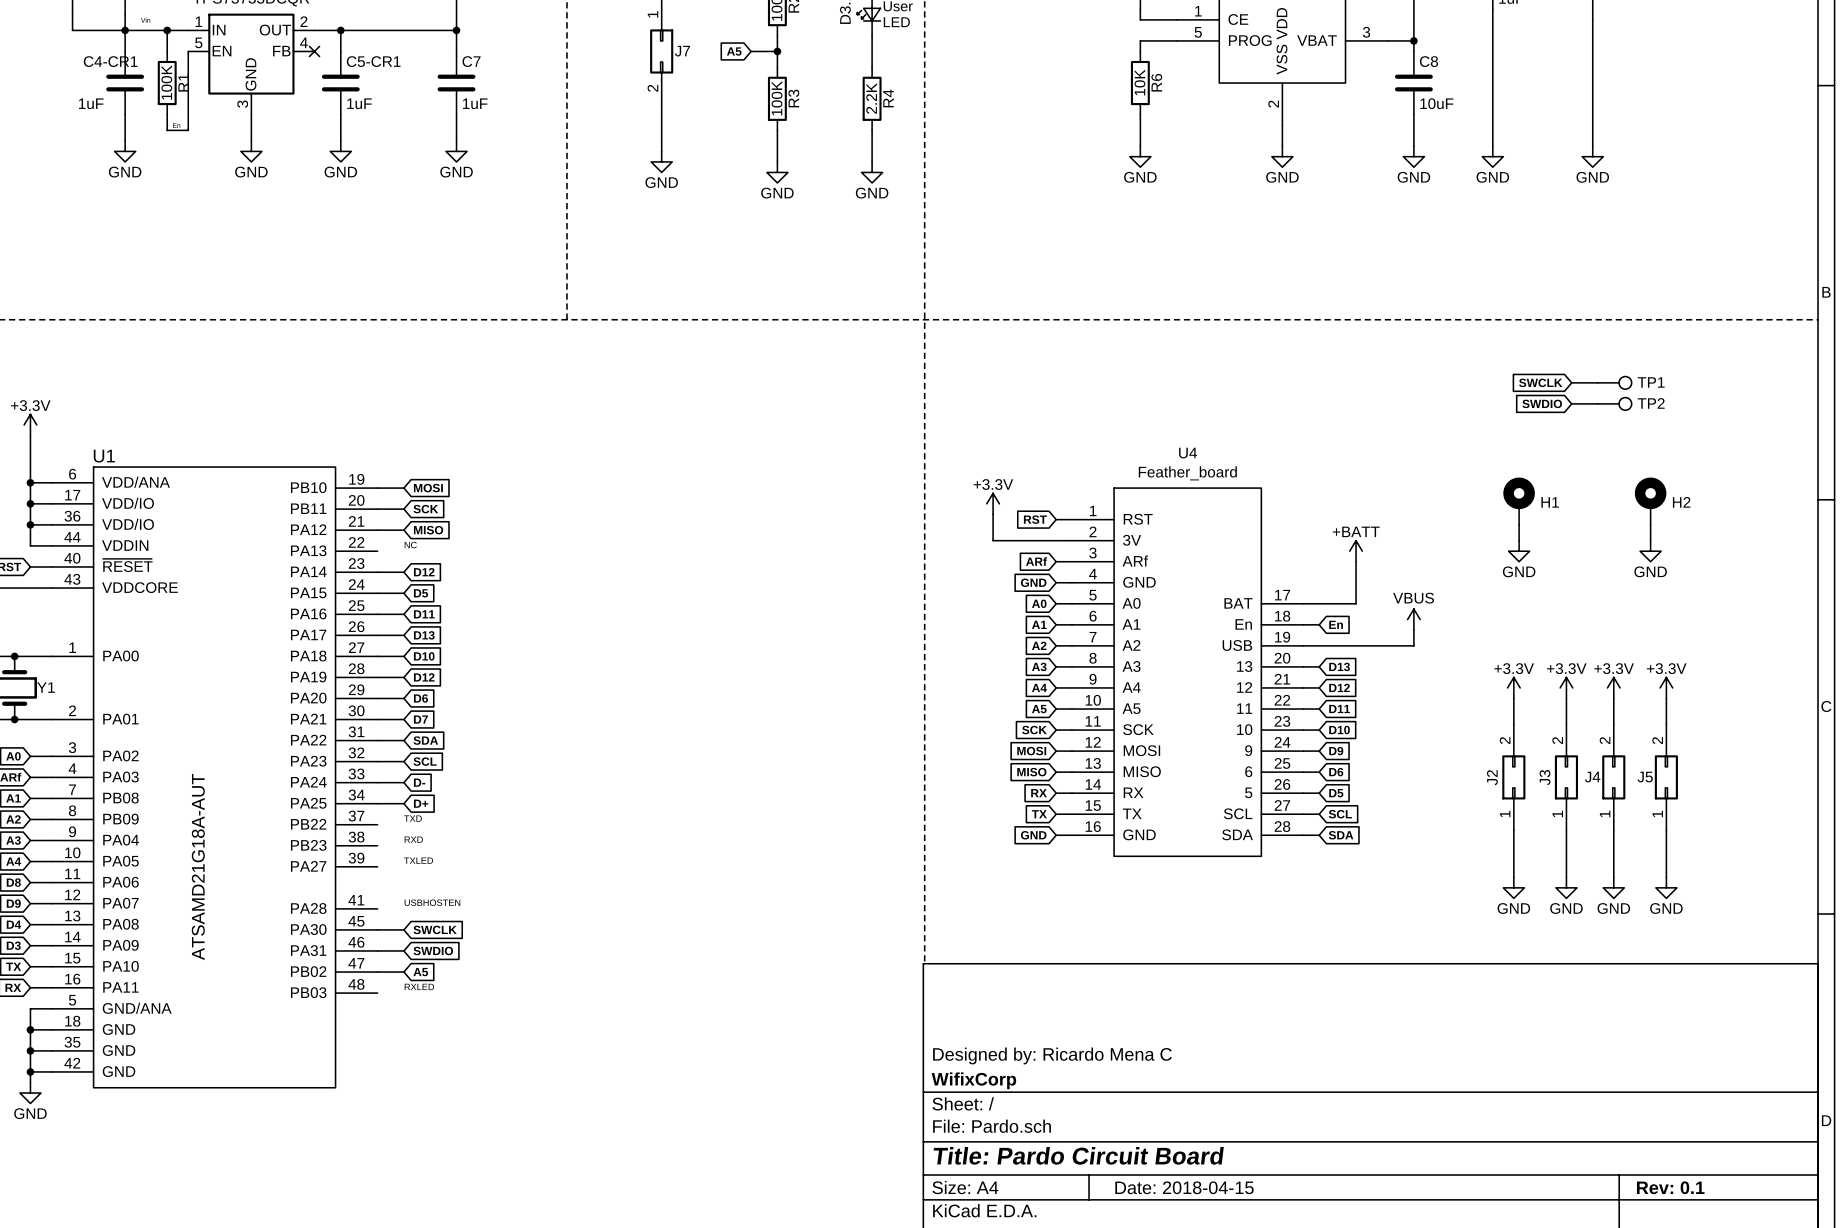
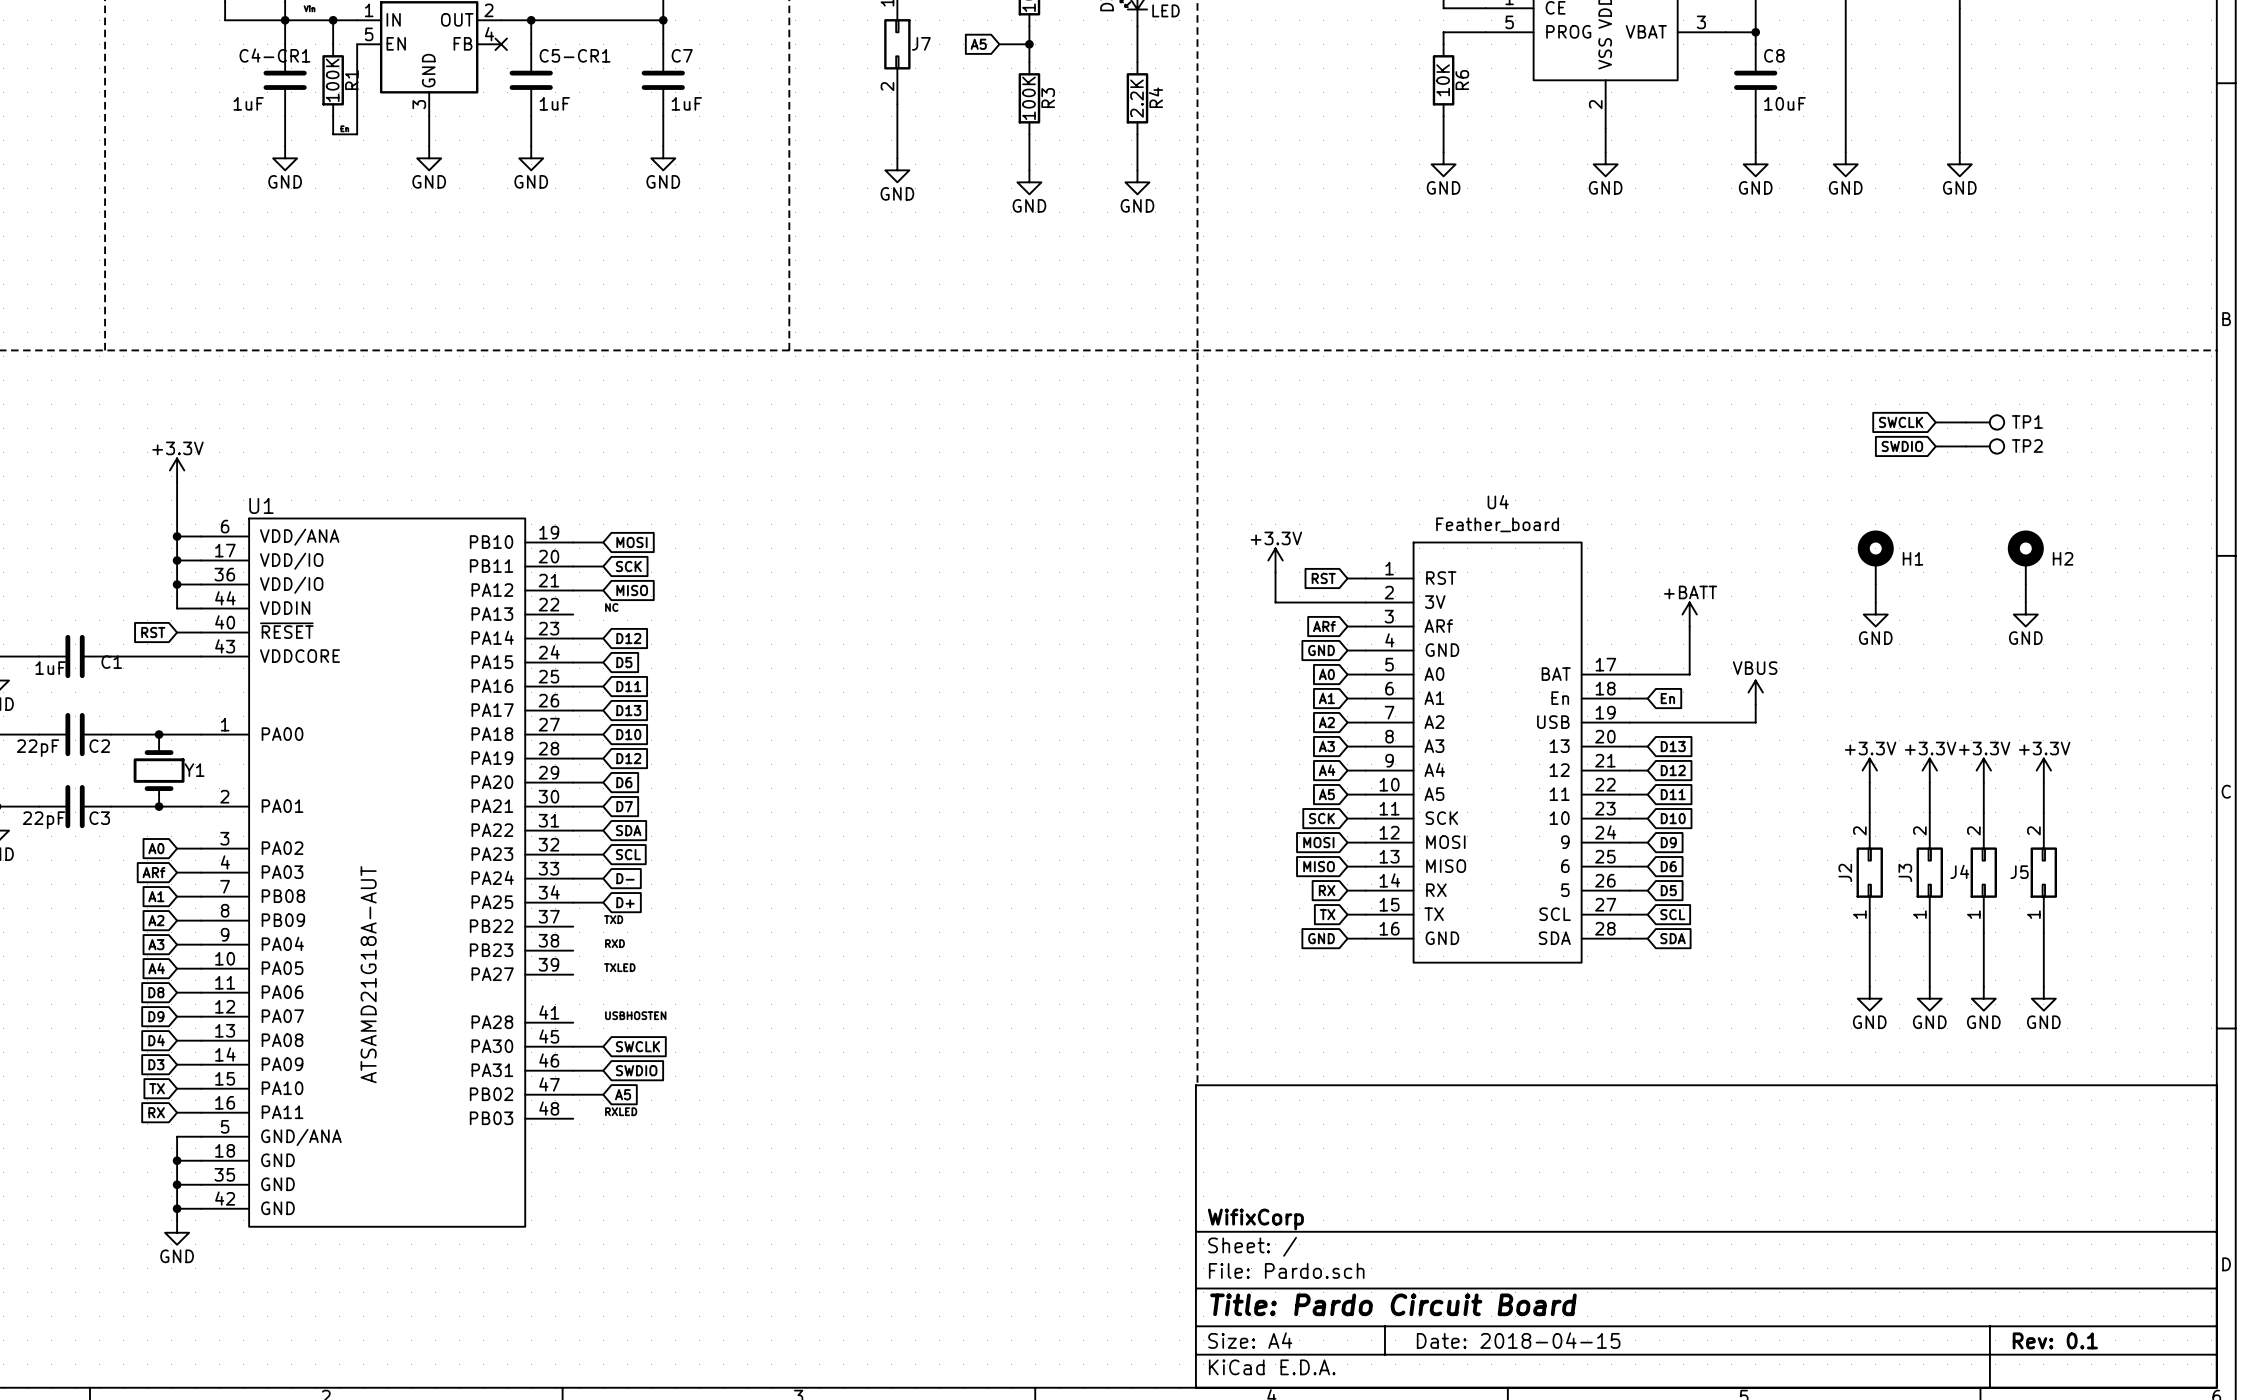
title block: Designed by: Ricardo Mena C (1052, 1055) -> none

